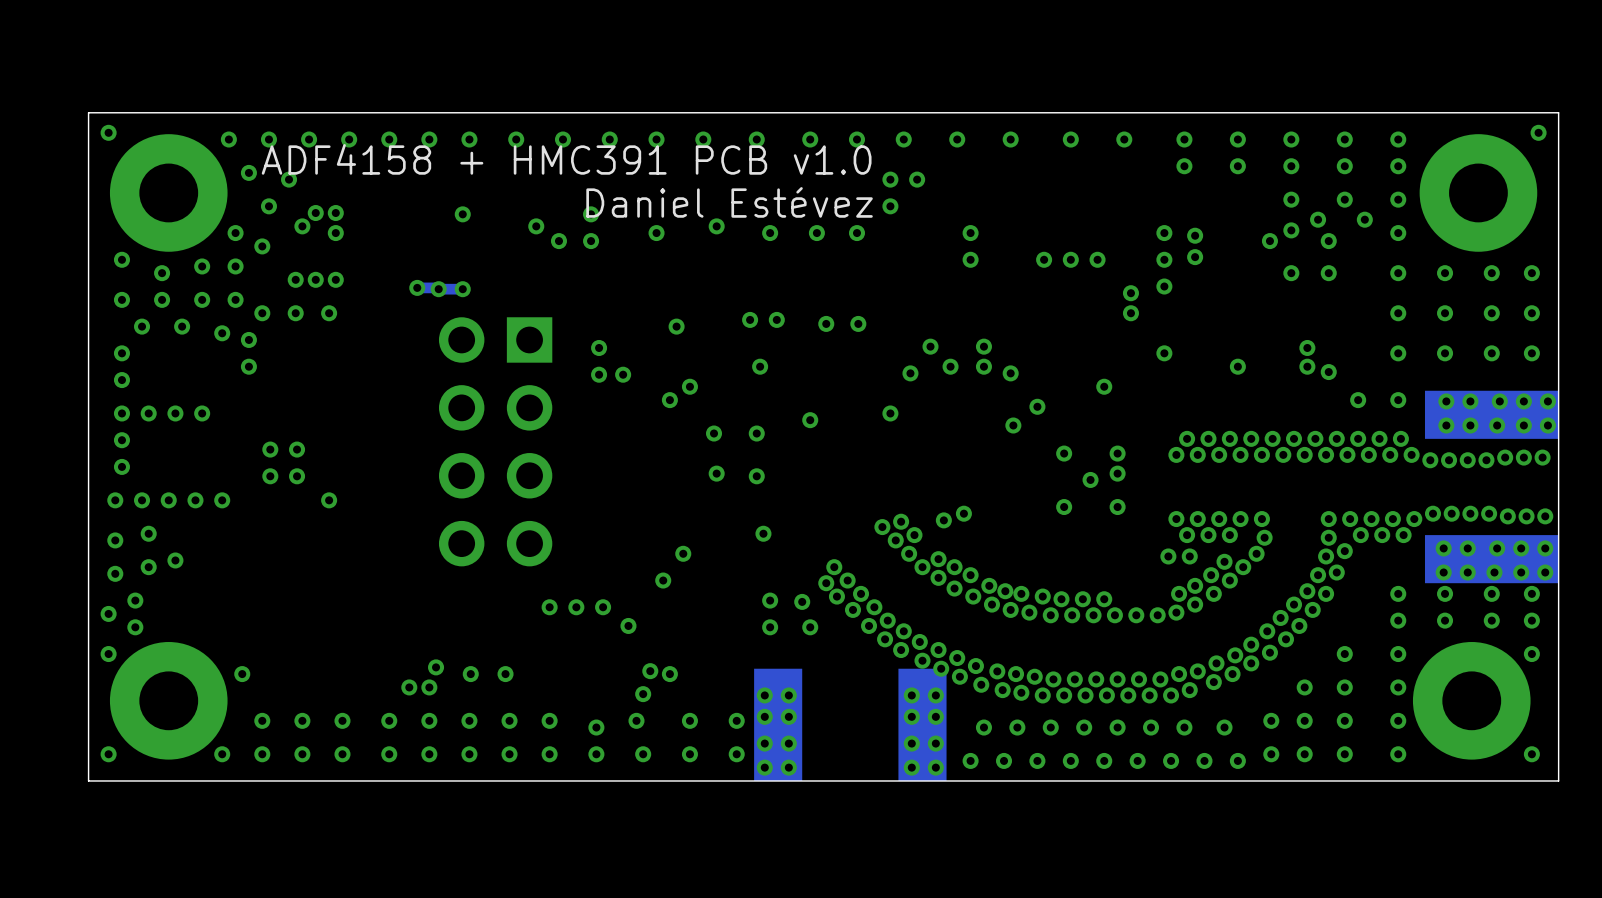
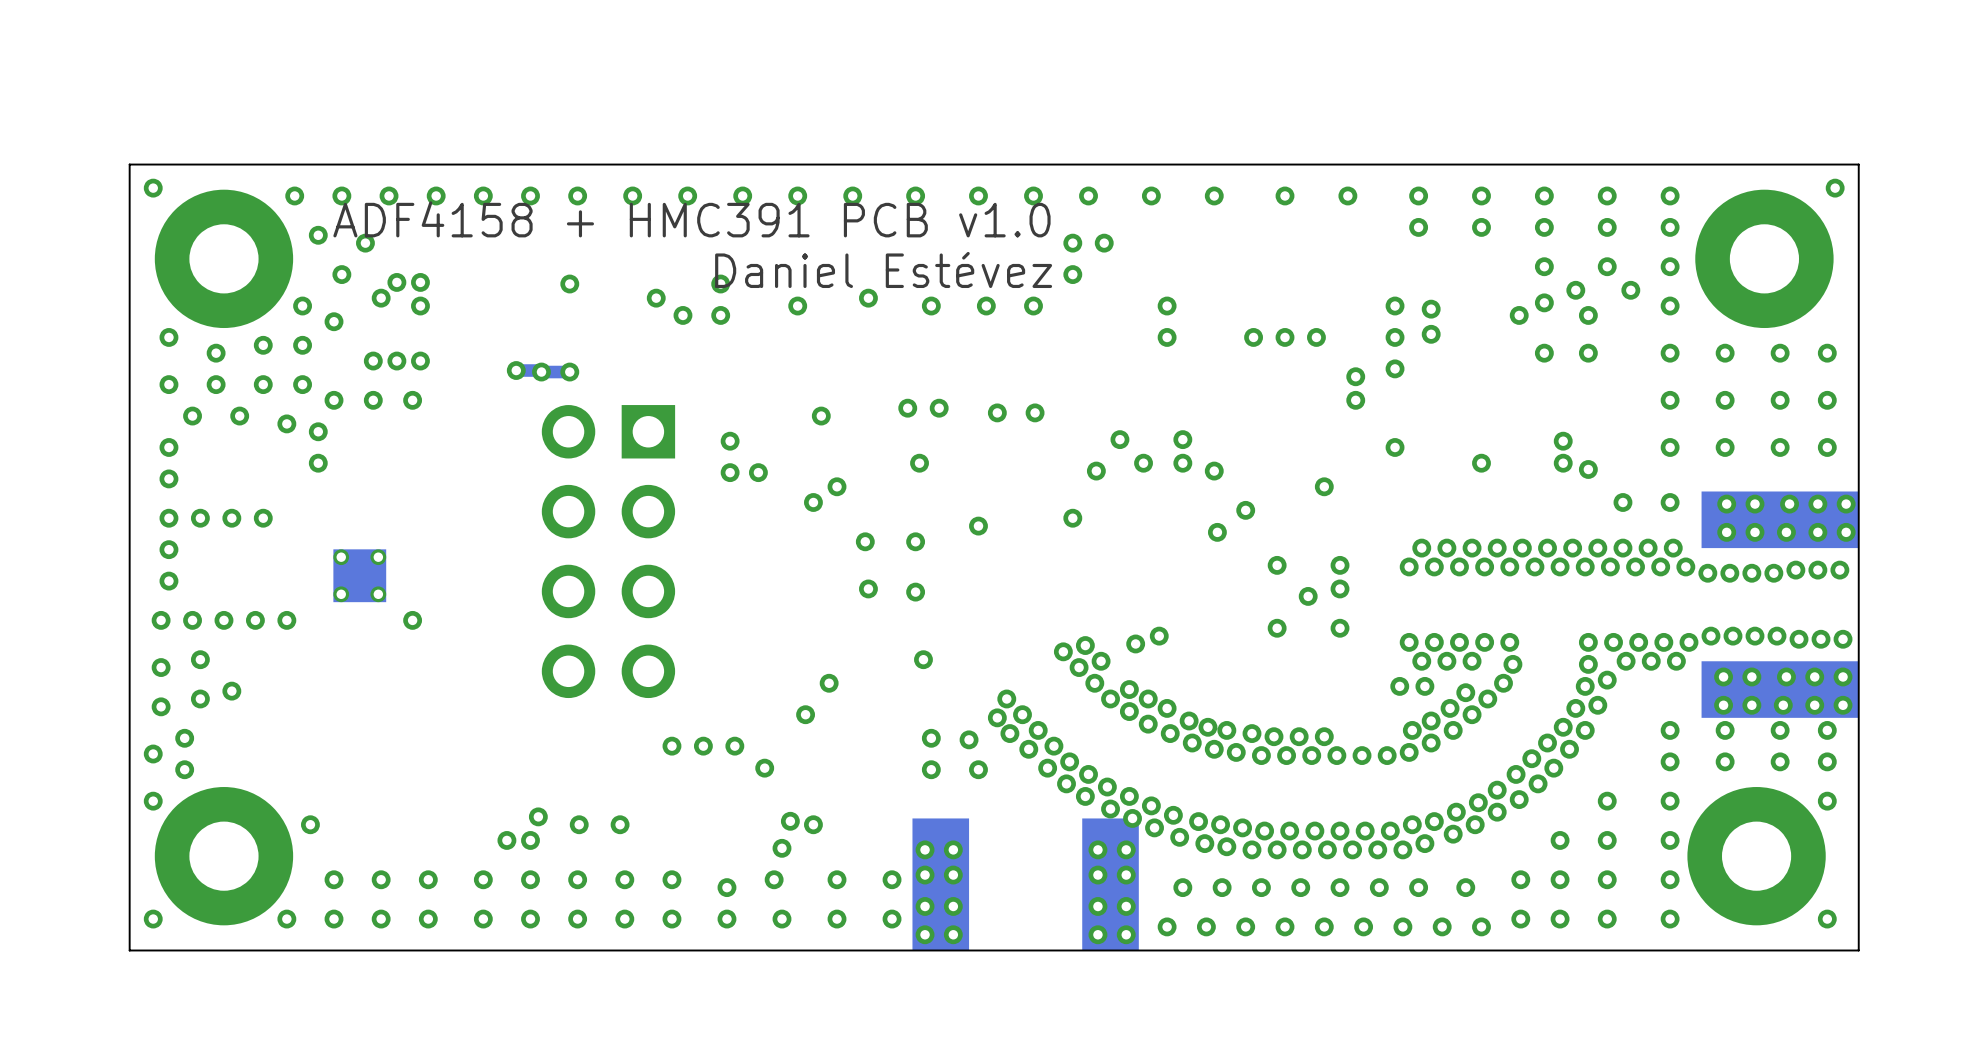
via: (270, 449) -> none
via: (297, 449) -> none
part: none -> (359, 575)
via: (270, 476) -> none
via: (297, 476) -> none

